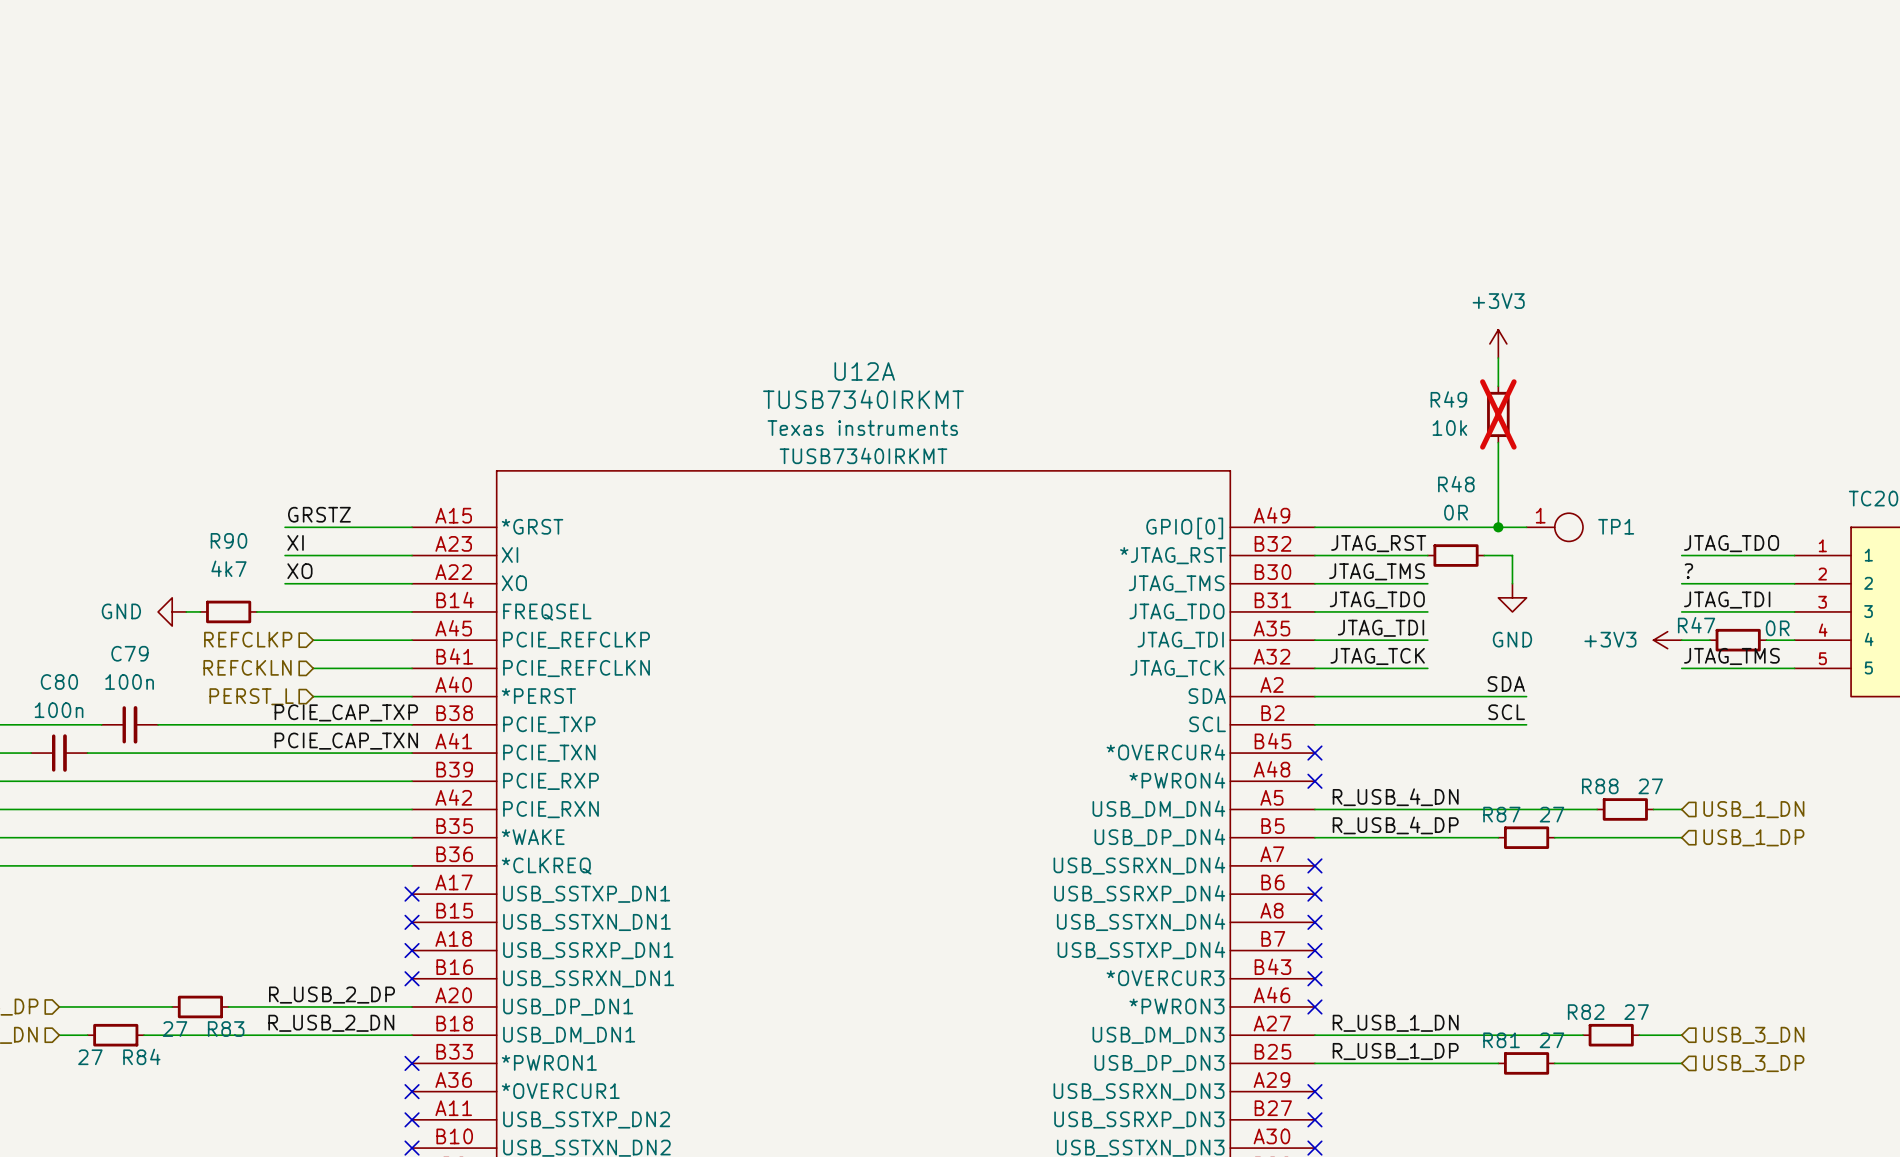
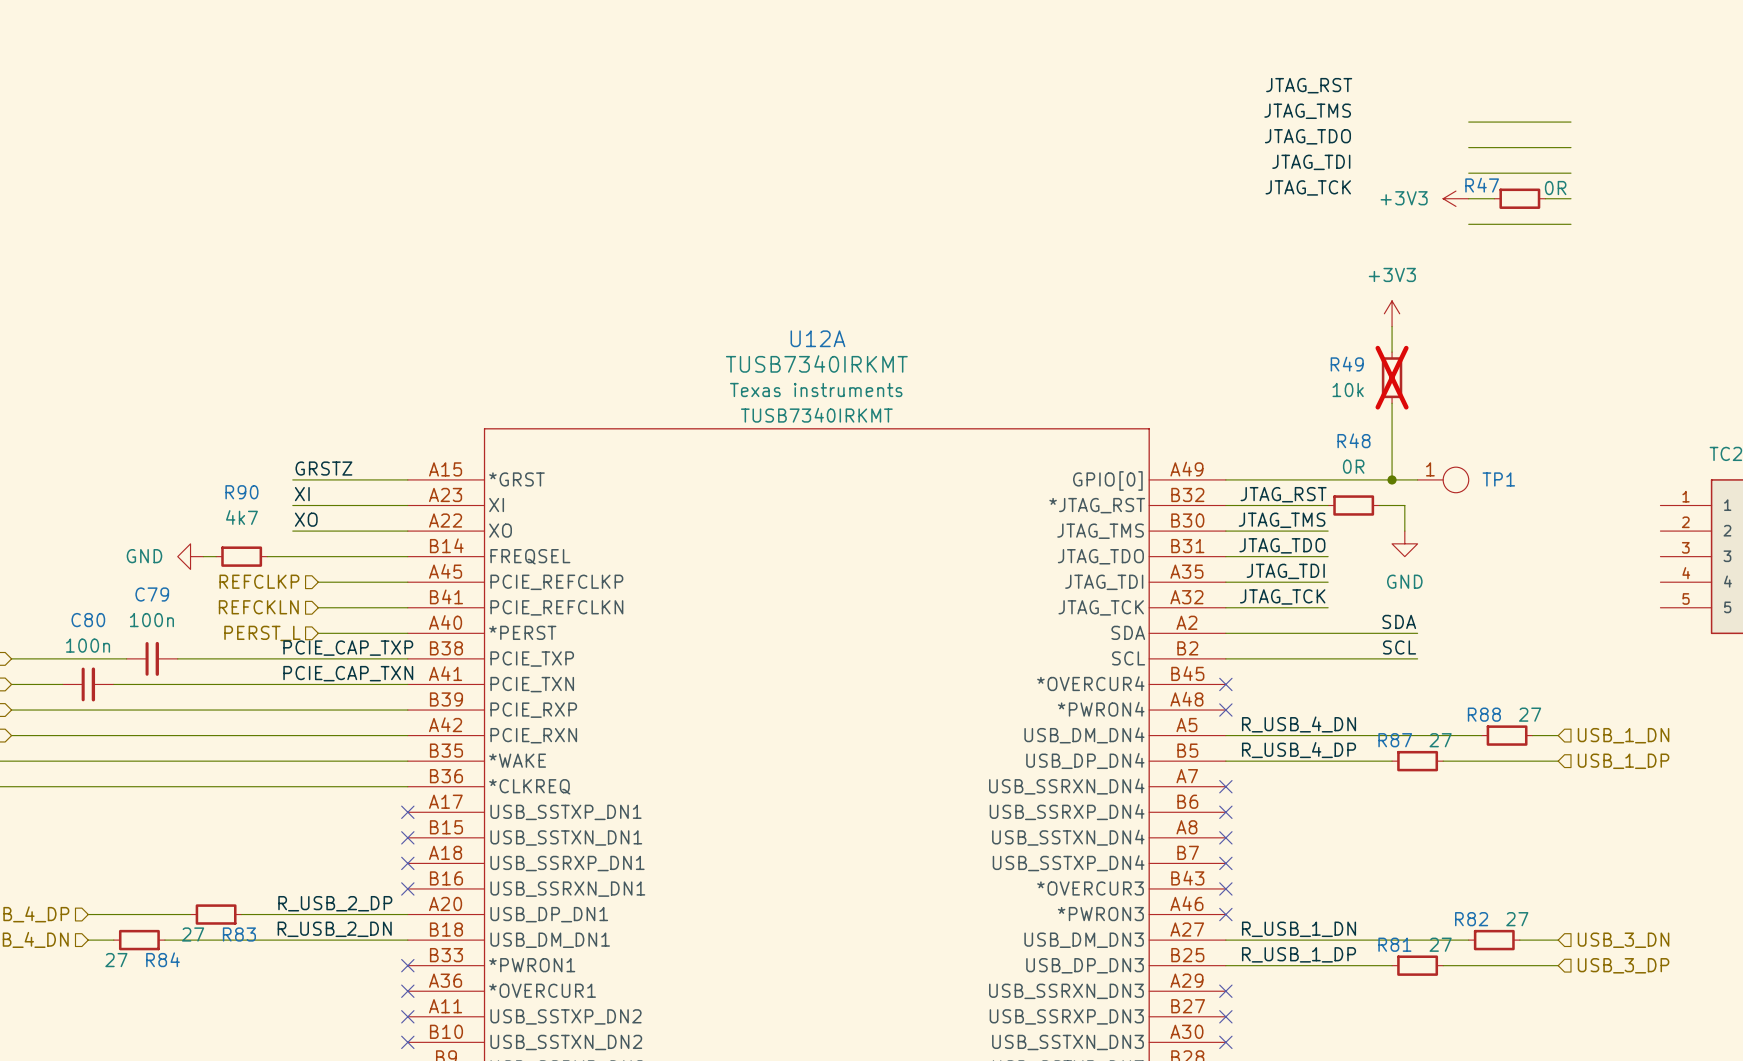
label: none -> JTAG_RST (1309, 85)
label: none -> JTAG_TMS (1307, 111)
wire: none -> (1468, 122) (1570, 122)
label: none -> JTAG_TDO (1307, 136)
wire: none -> (1468, 147) (1570, 147)
label: none -> JTAG_TDI (1311, 162)
wire: none -> (1468, 173) (1570, 173)
label: none -> JTAG_TCK (1308, 187)
power symbol: none -> +3V3 (1455, 198)
wire: none -> (1468, 198) (1494, 198)
wire: none -> (1545, 198) (1570, 198)
wire: none -> (1468, 224) (1570, 224)
label: JTAG_TDO (1731, 543) -> none
wire: (1681, 555) (1794, 555) -> none
label: ? (1688, 571) -> none
wire: (1681, 583) (1794, 583) -> none
label: JTAG_TDI (1727, 600) -> none
wire: (1681, 611) (1794, 611) -> none
power symbol: +3V3 (1667, 640) -> none
wire: (1681, 640) (1709, 640) -> none
R47 position: (1738, 640) -> (1519, 198)
wire: (1766, 640) (1794, 640) -> none
label: JTAG_TMS (1731, 656) -> none
wire: (1681, 668) (1794, 668) -> none

